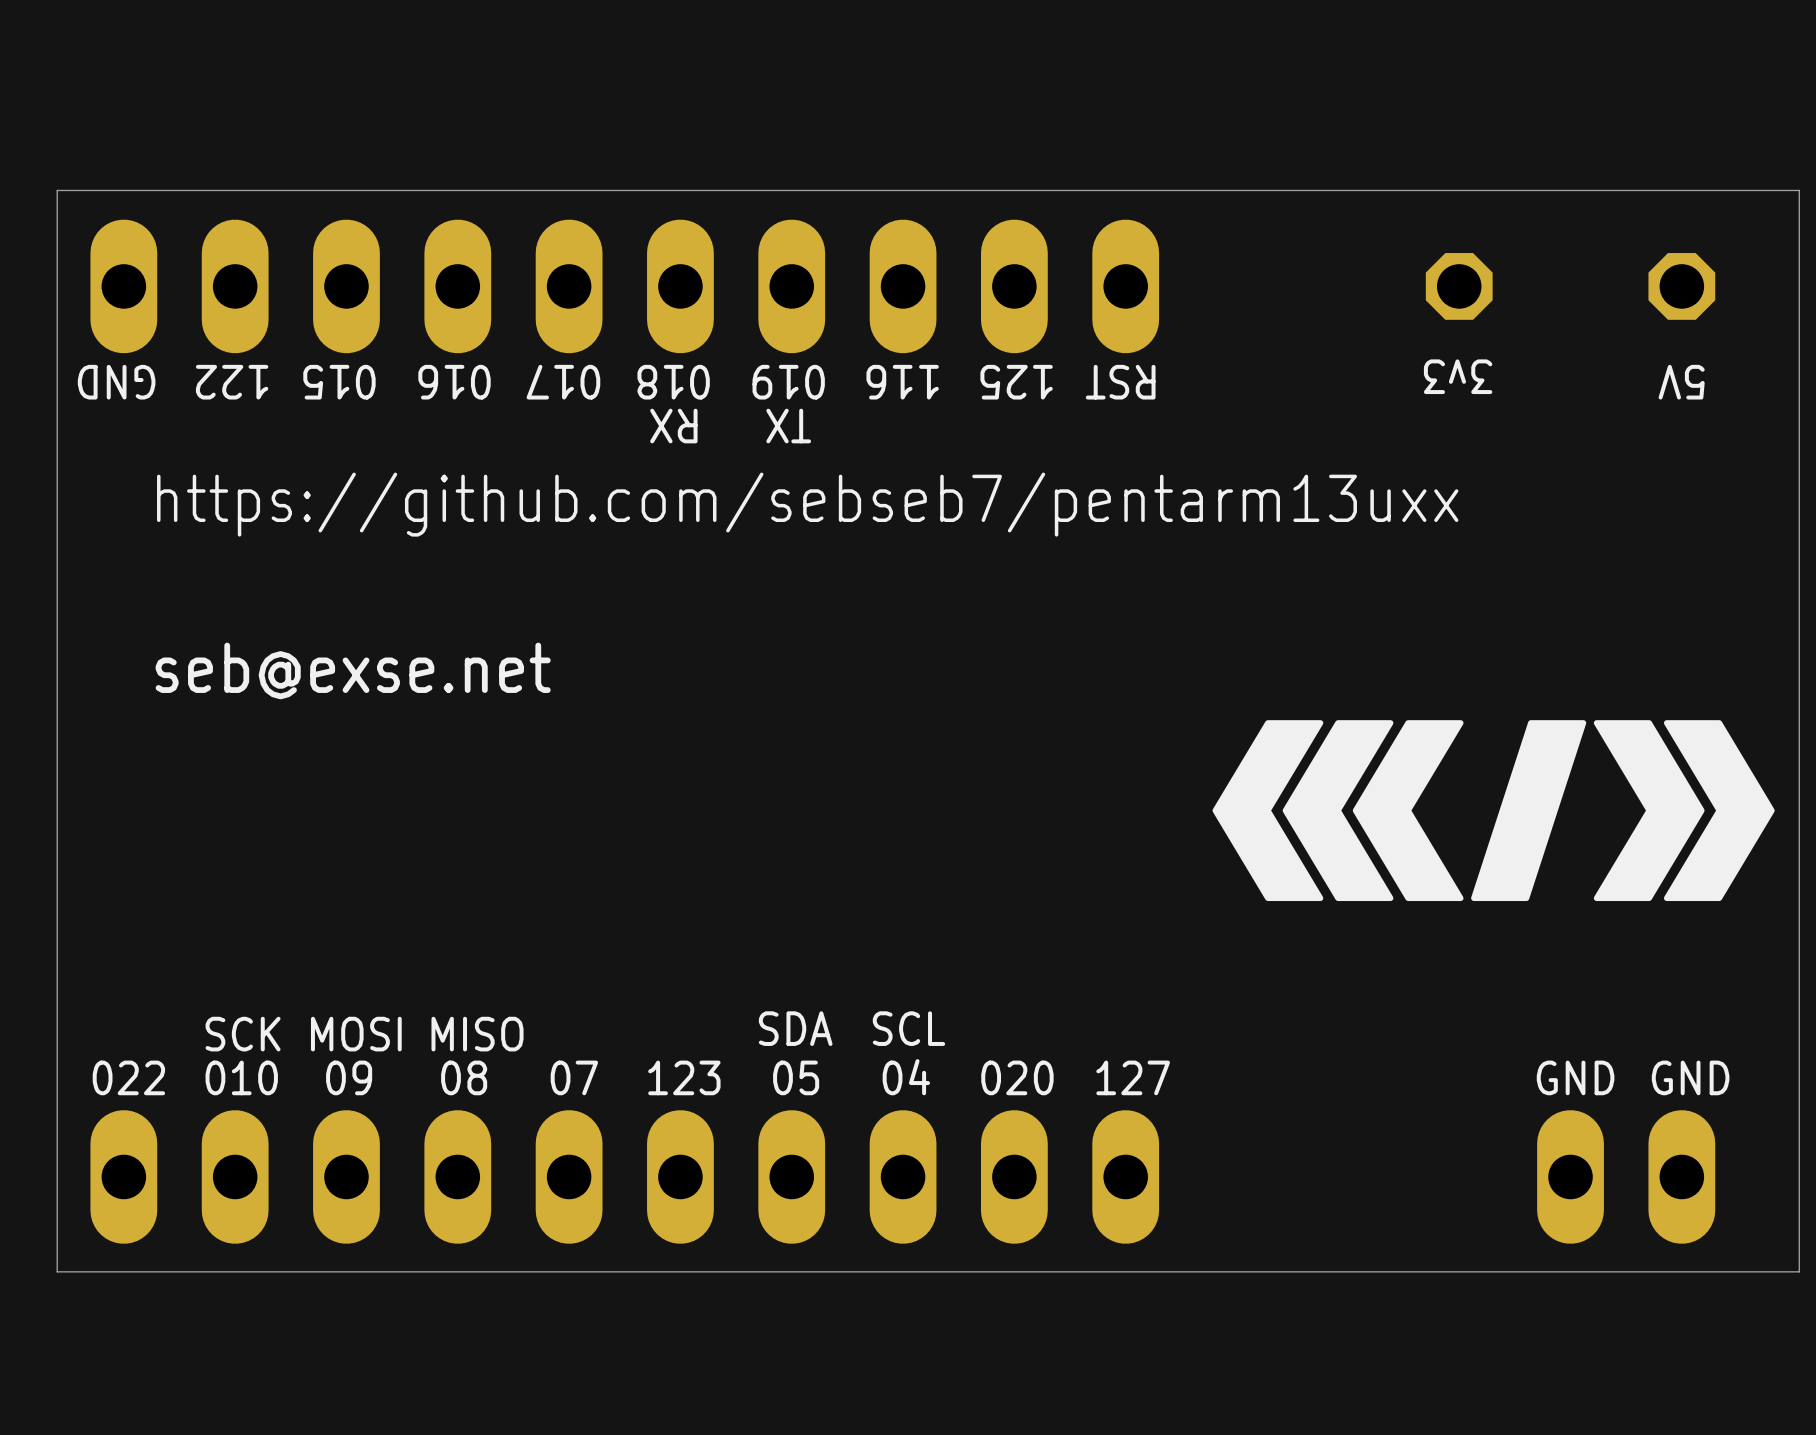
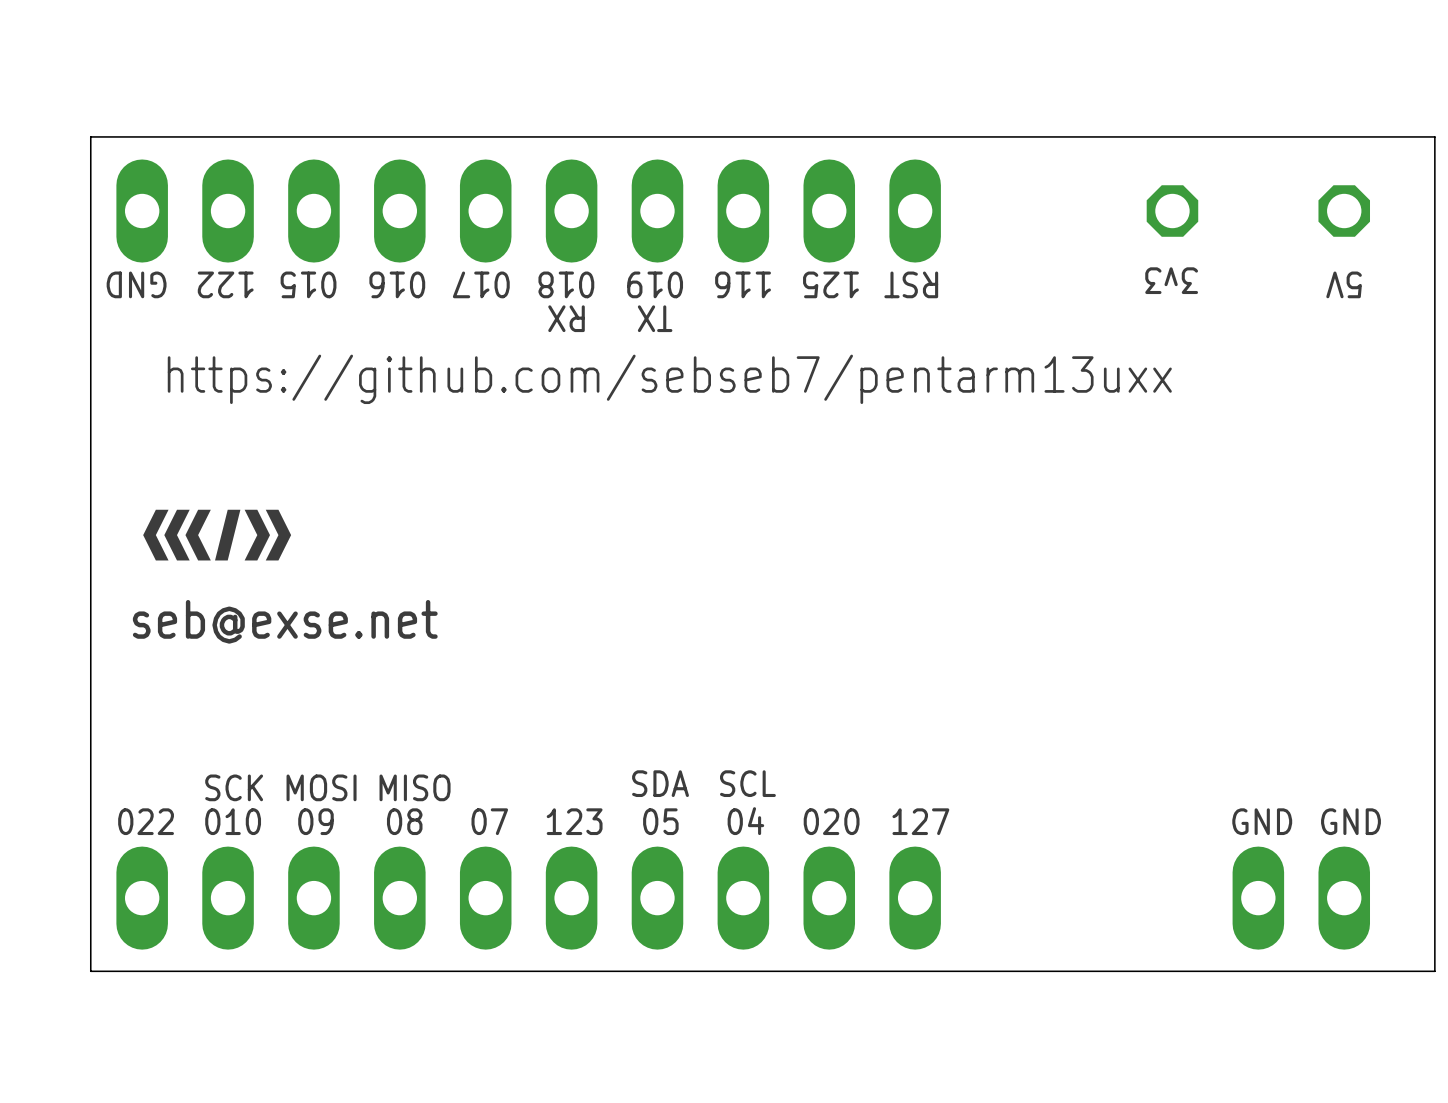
text position: seb@exse.net (353, 670) -> seb@exse.net (285, 621)
drawing: none -> [143, 509, 292, 561]
drawing: [1212, 720, 1775, 902] -> none

